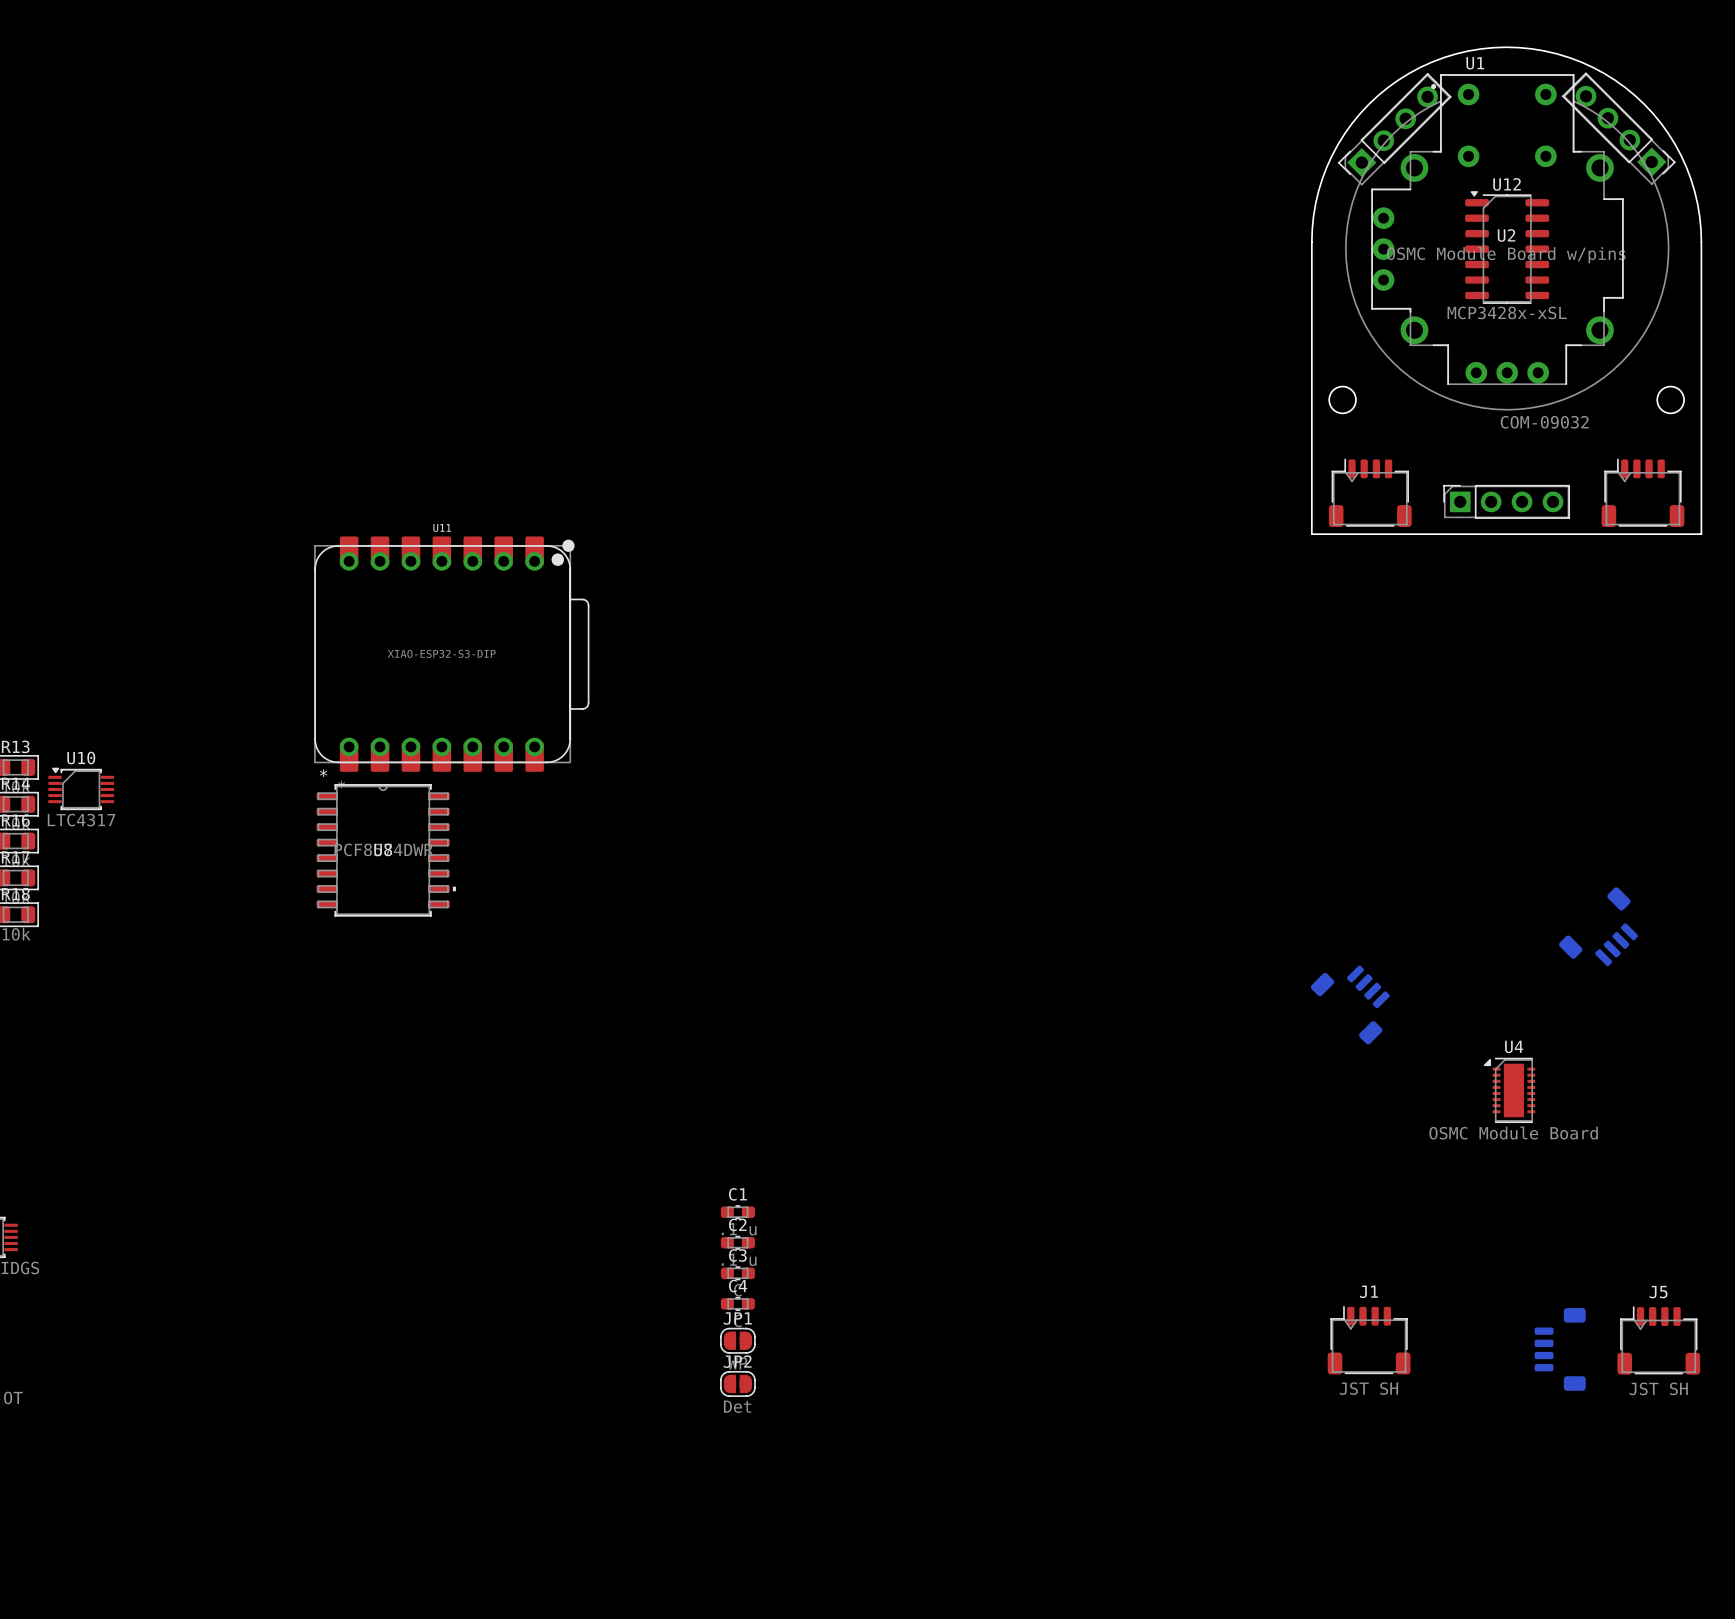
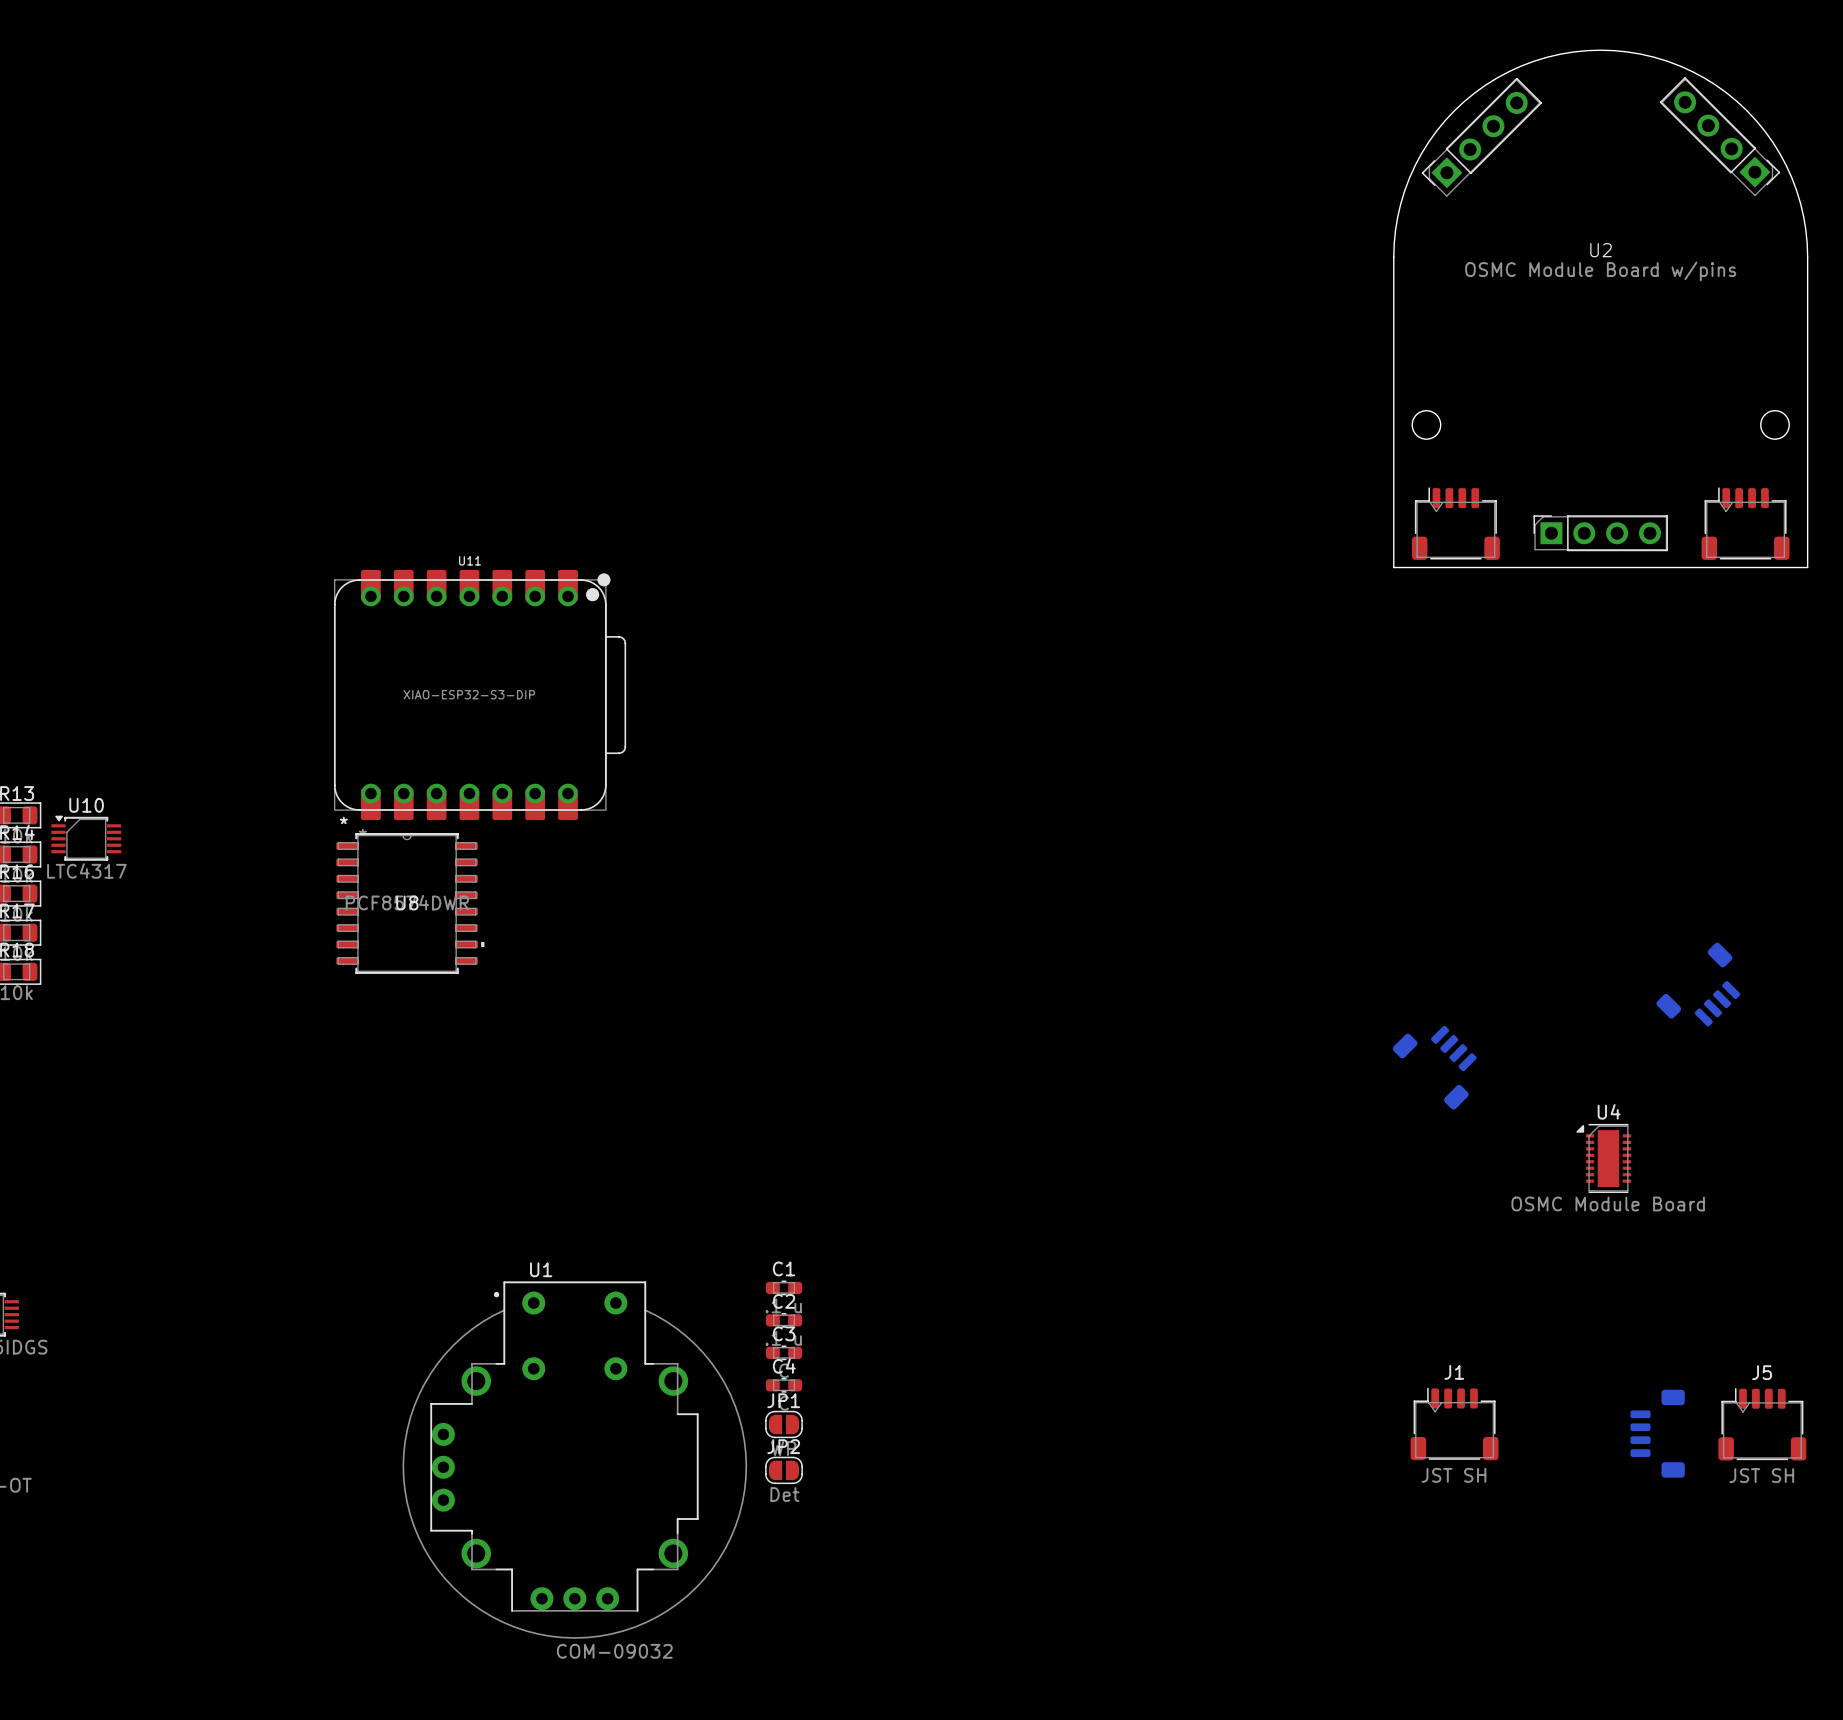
U1 position: (1507, 242) -> (574, 1460)
U12: MCP3428x-xSL (1507, 247) -> none

